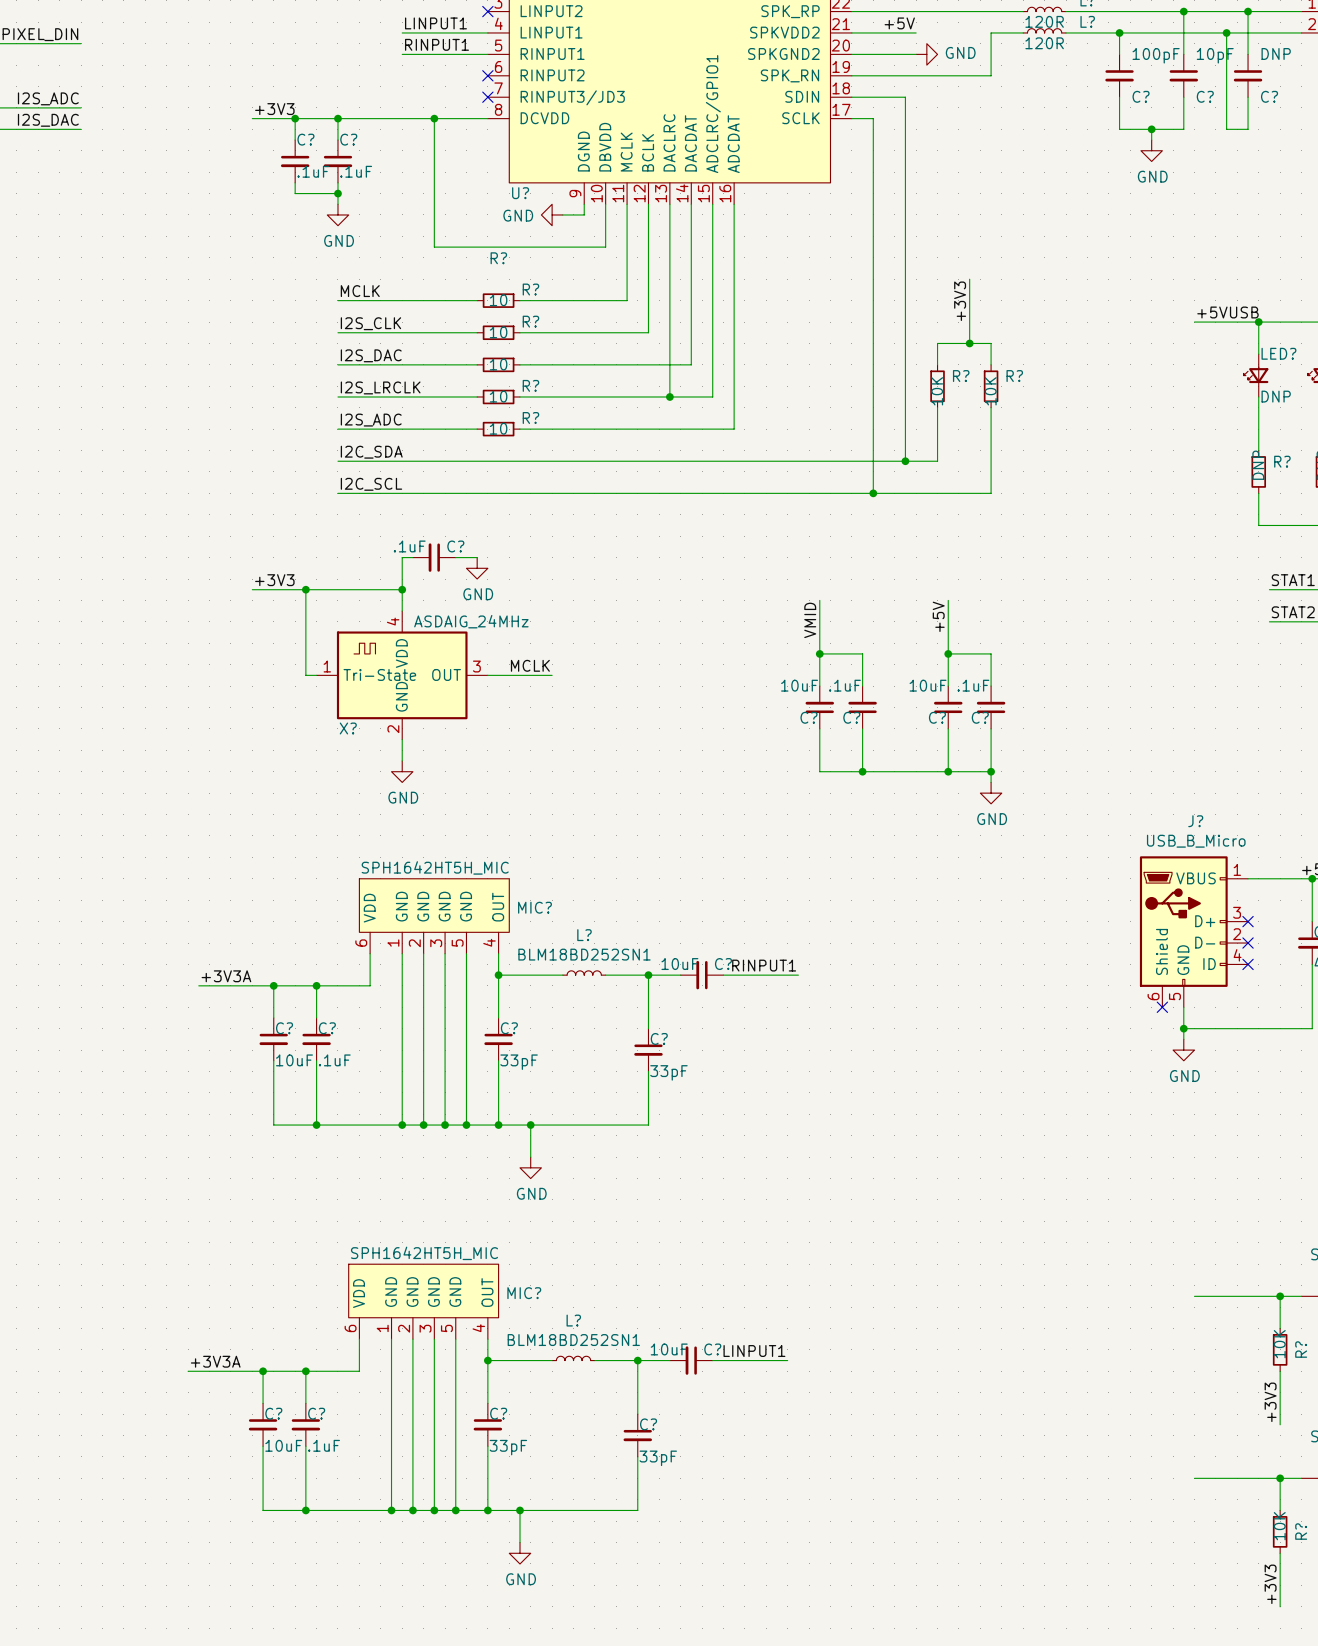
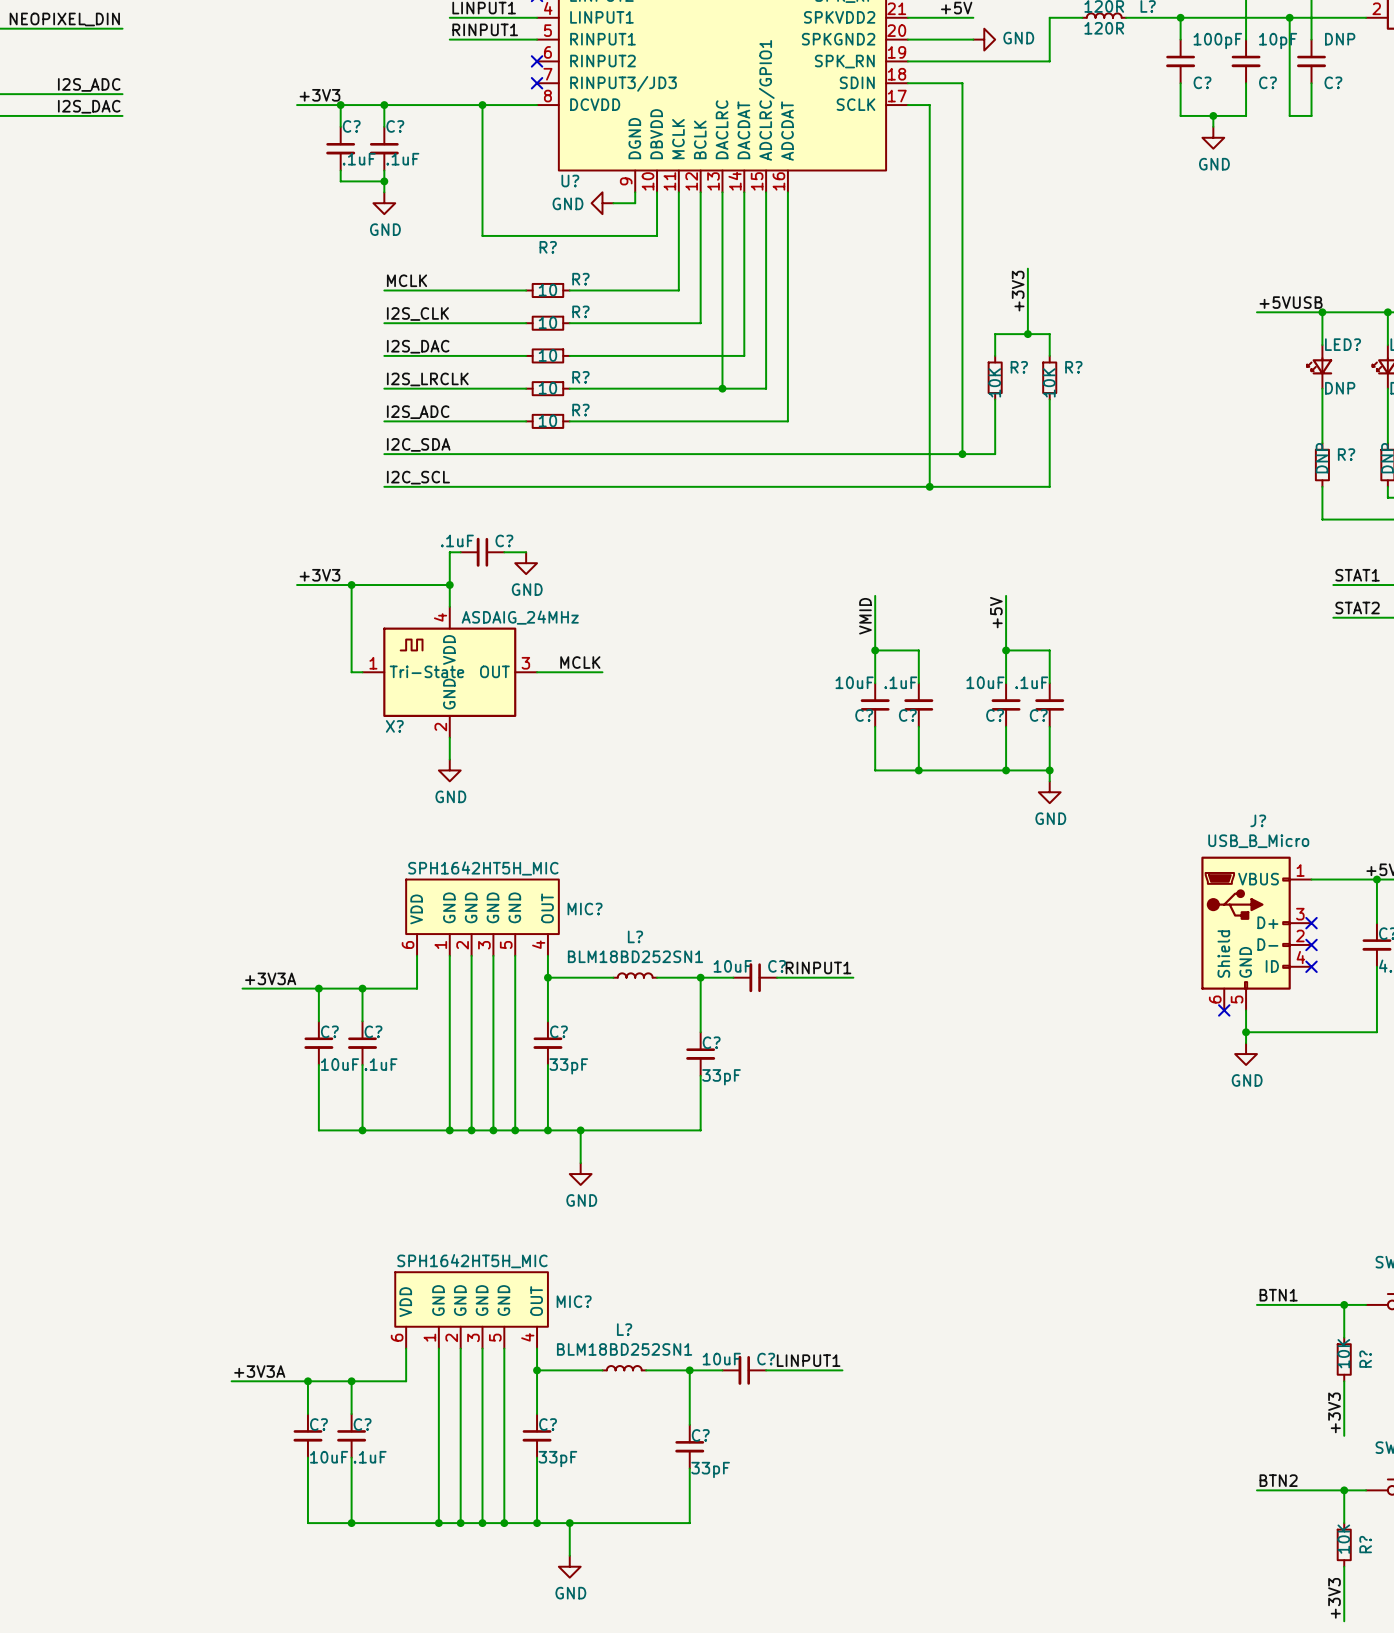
label: none -> BTN1 (1278, 1295)
label: none -> BTN2 (1278, 1480)

